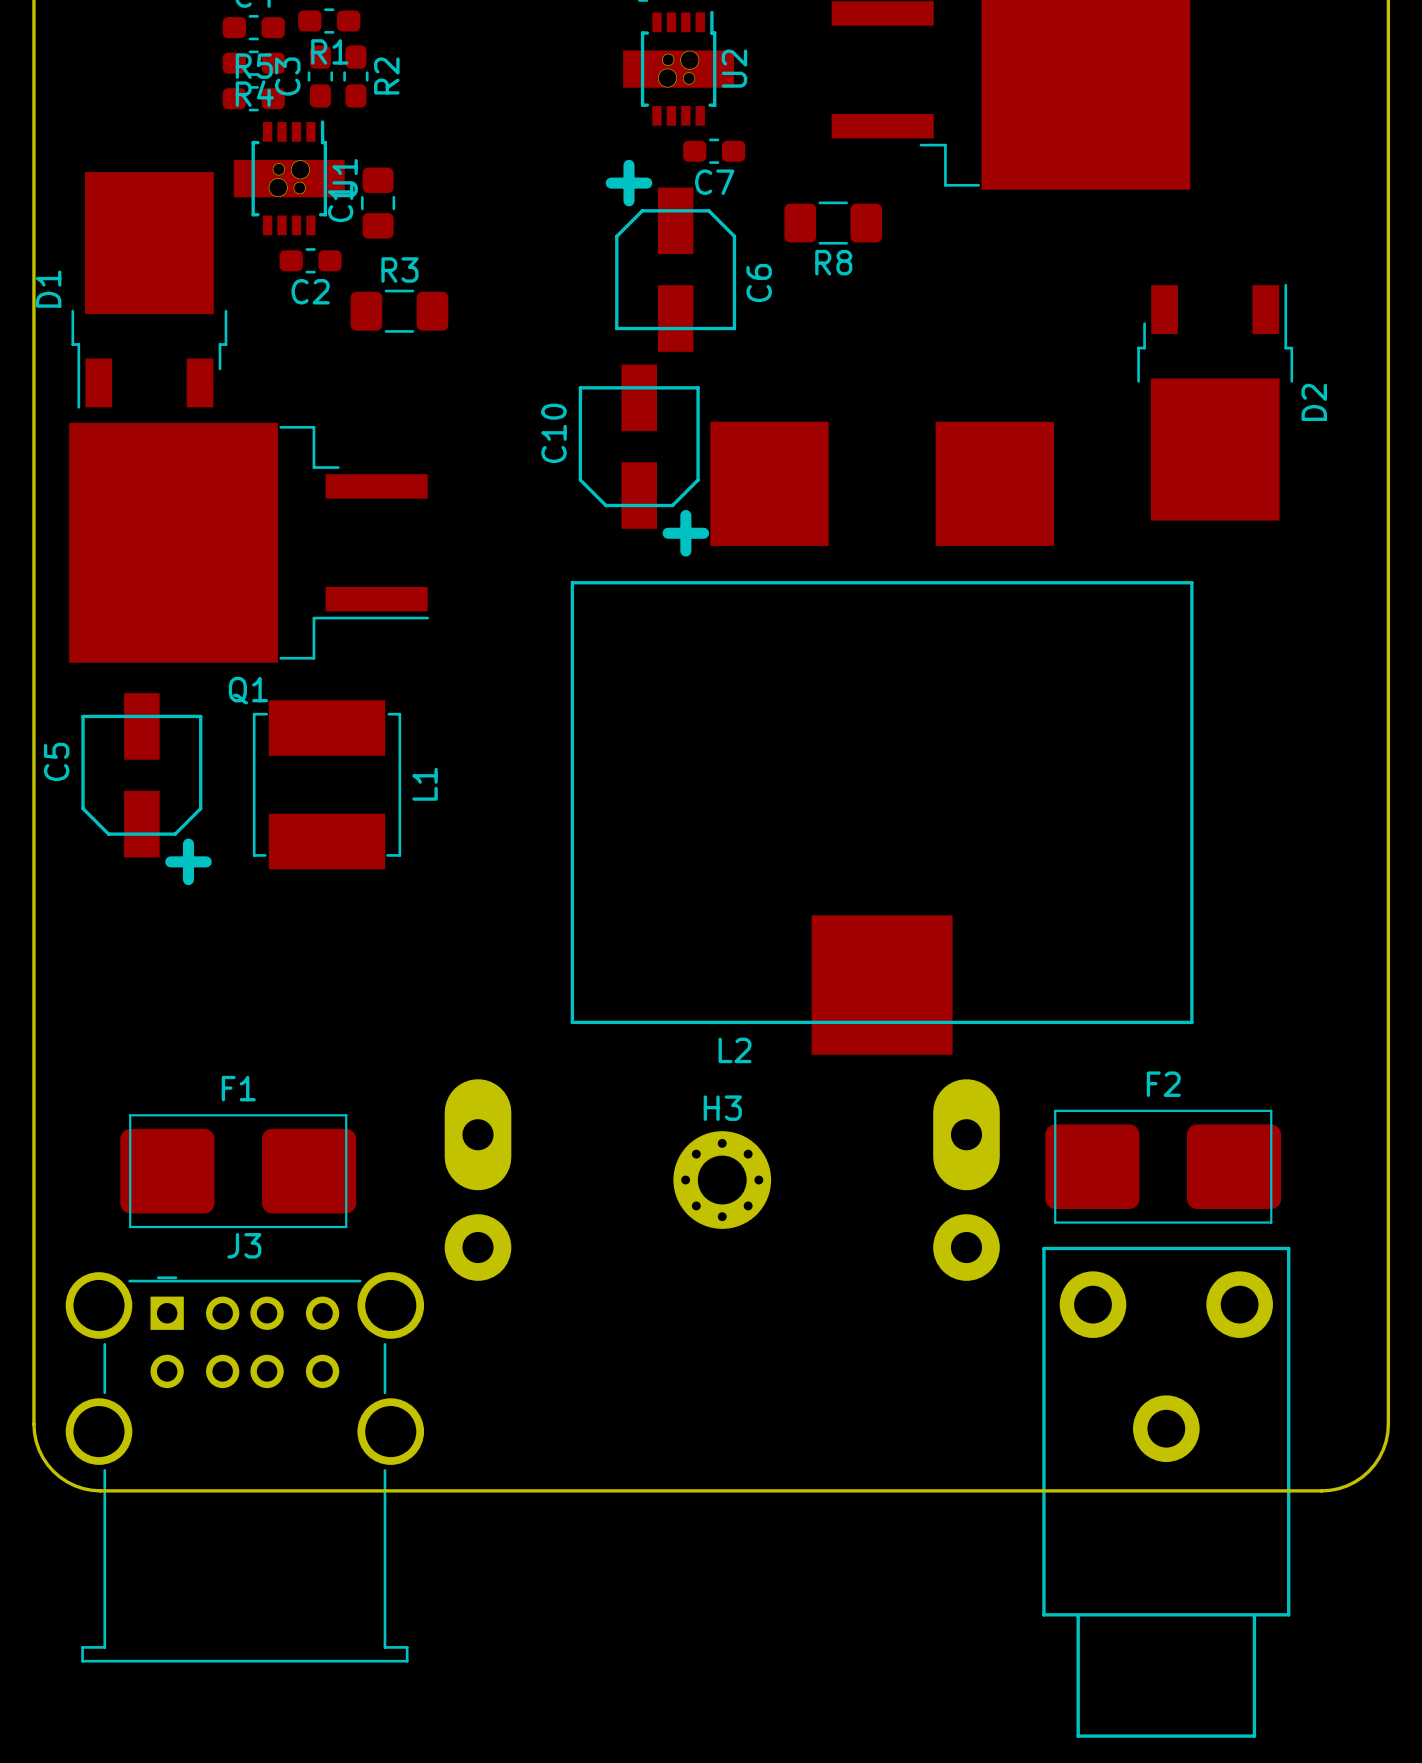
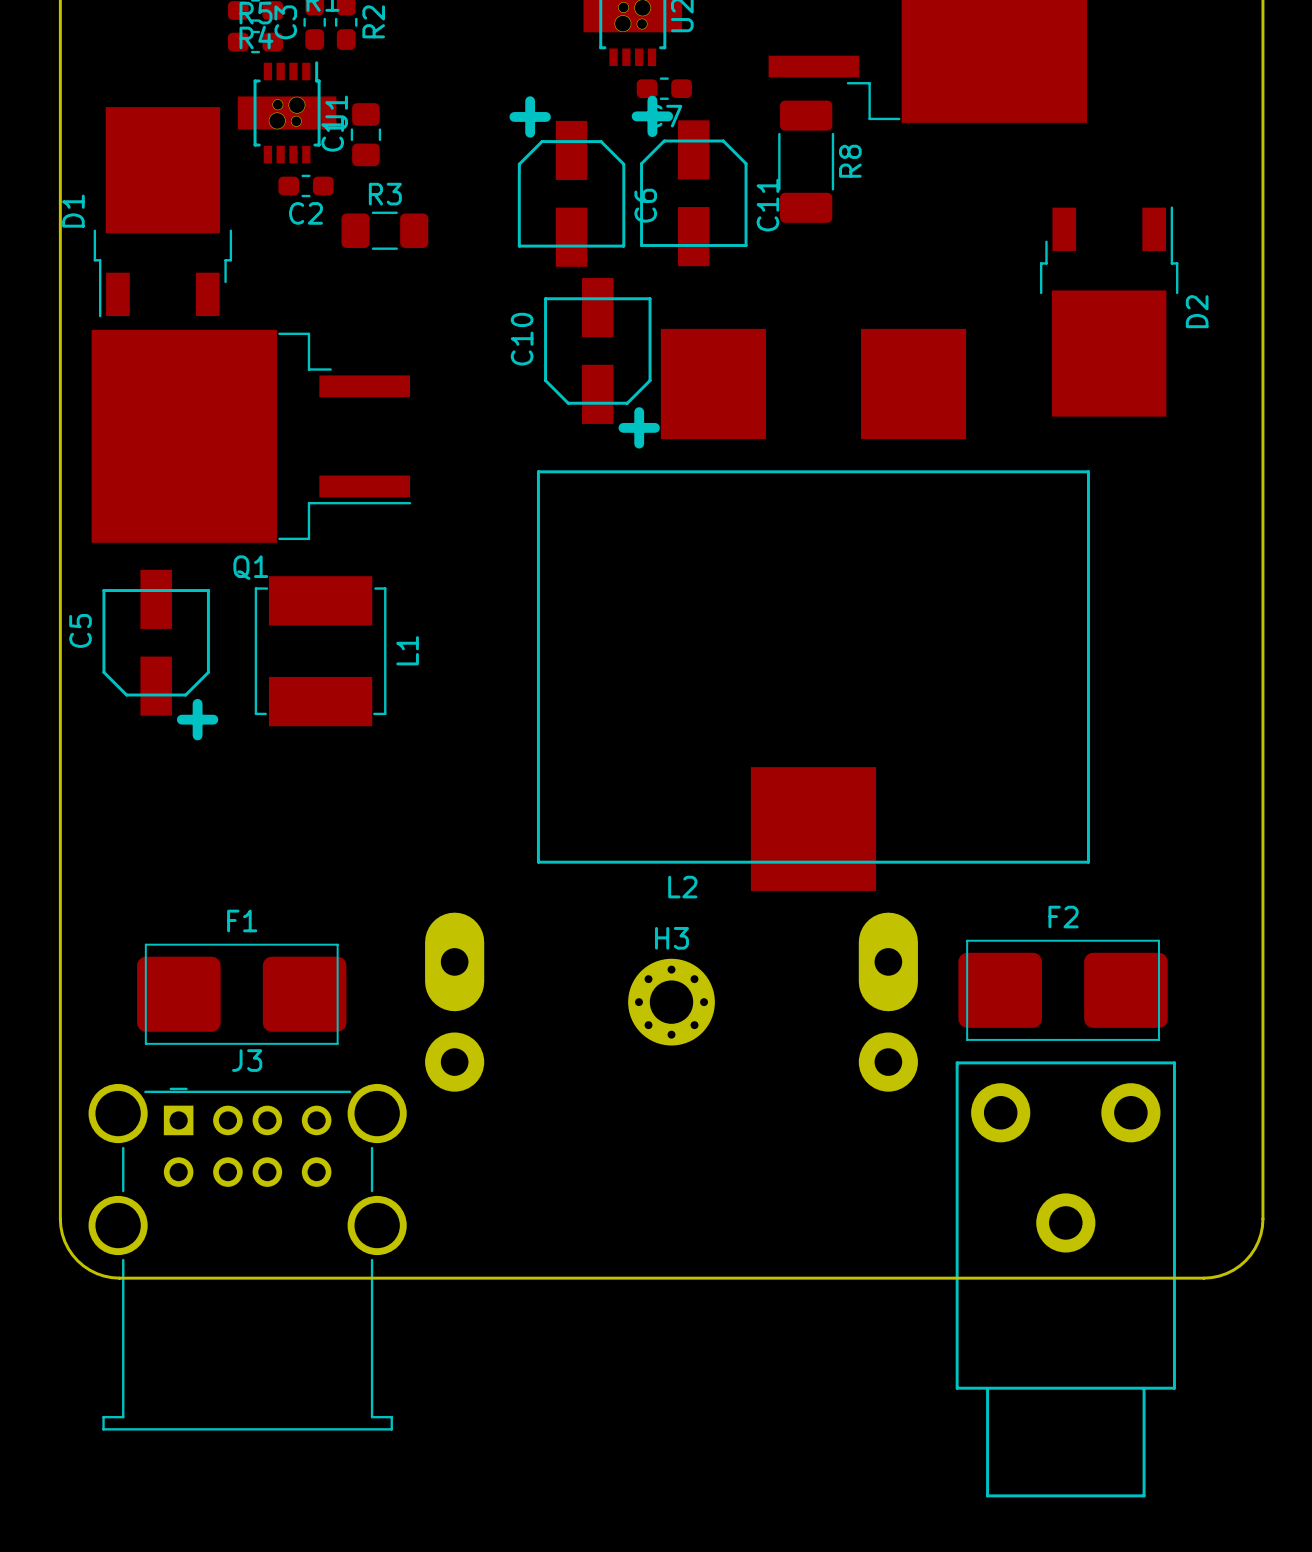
R8 footprint: [784, 201, 883, 245] -> [778, 100, 835, 223]
C6 position: (670, 255) -> (567, 181)
C11: none -> (689, 180)
R8 name position: R8 (833, 262) -> R8 (850, 161)

